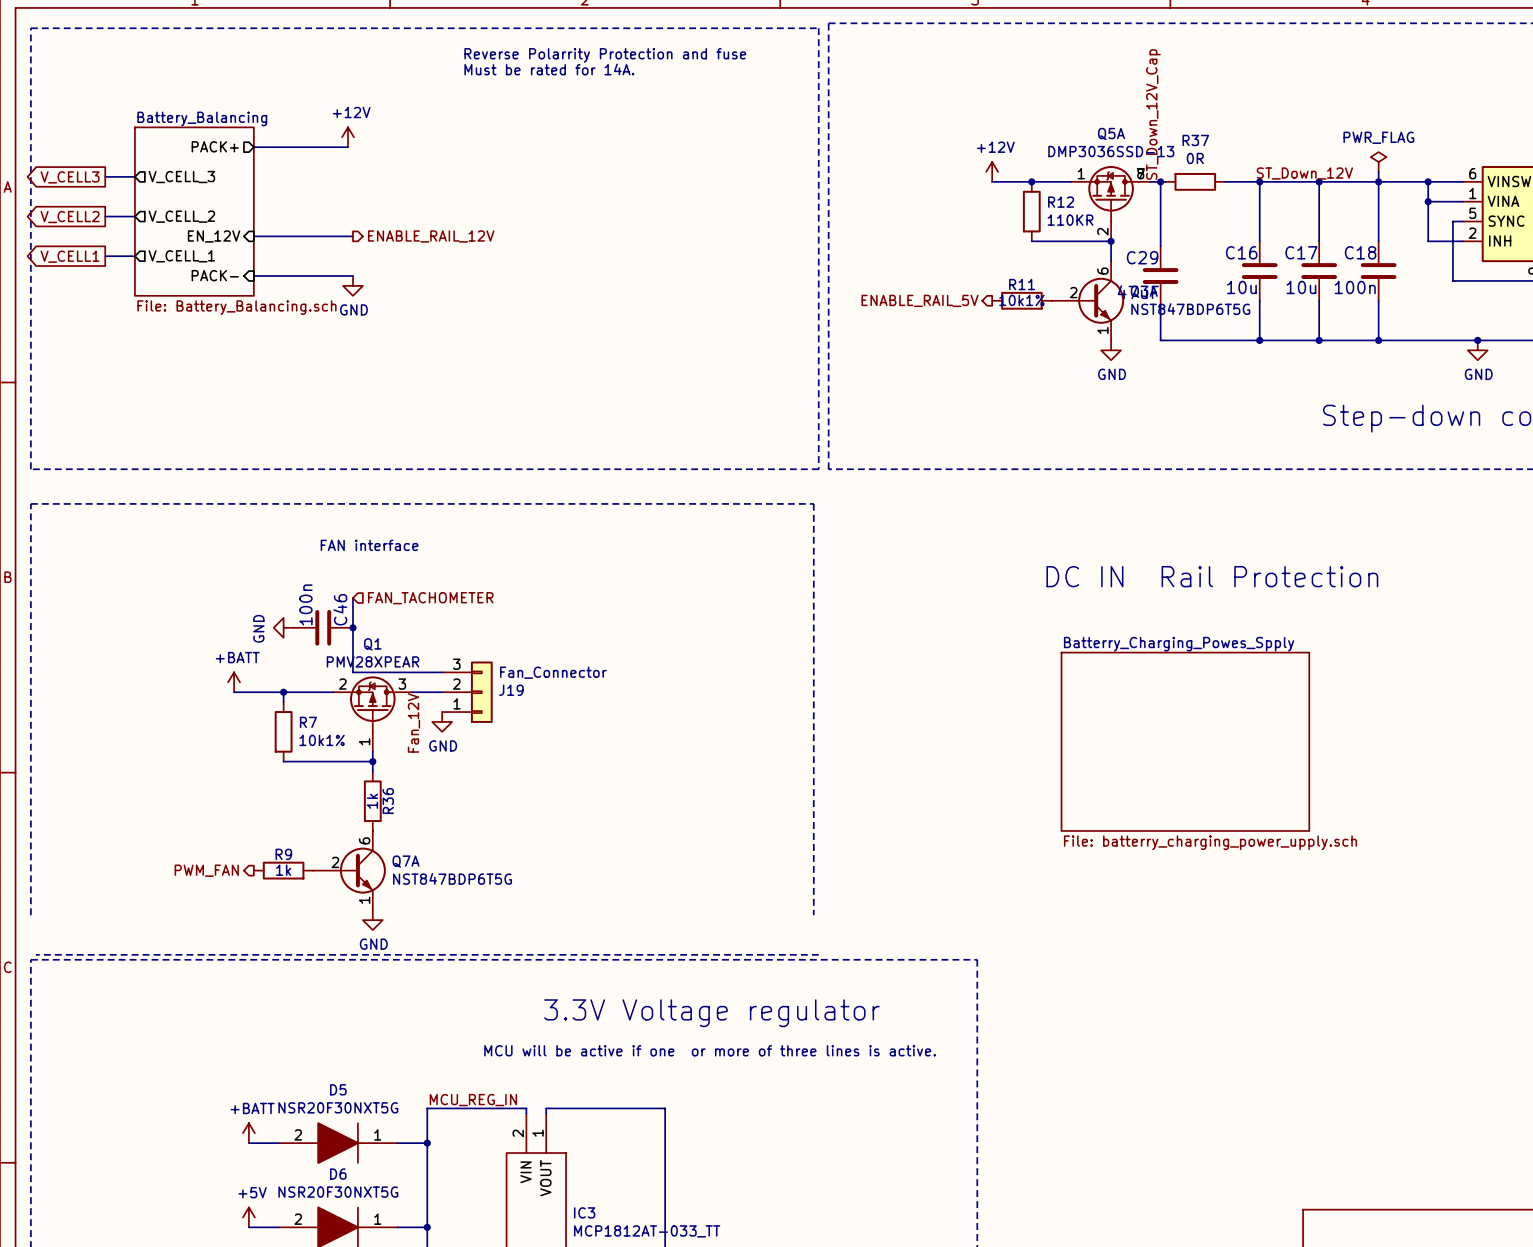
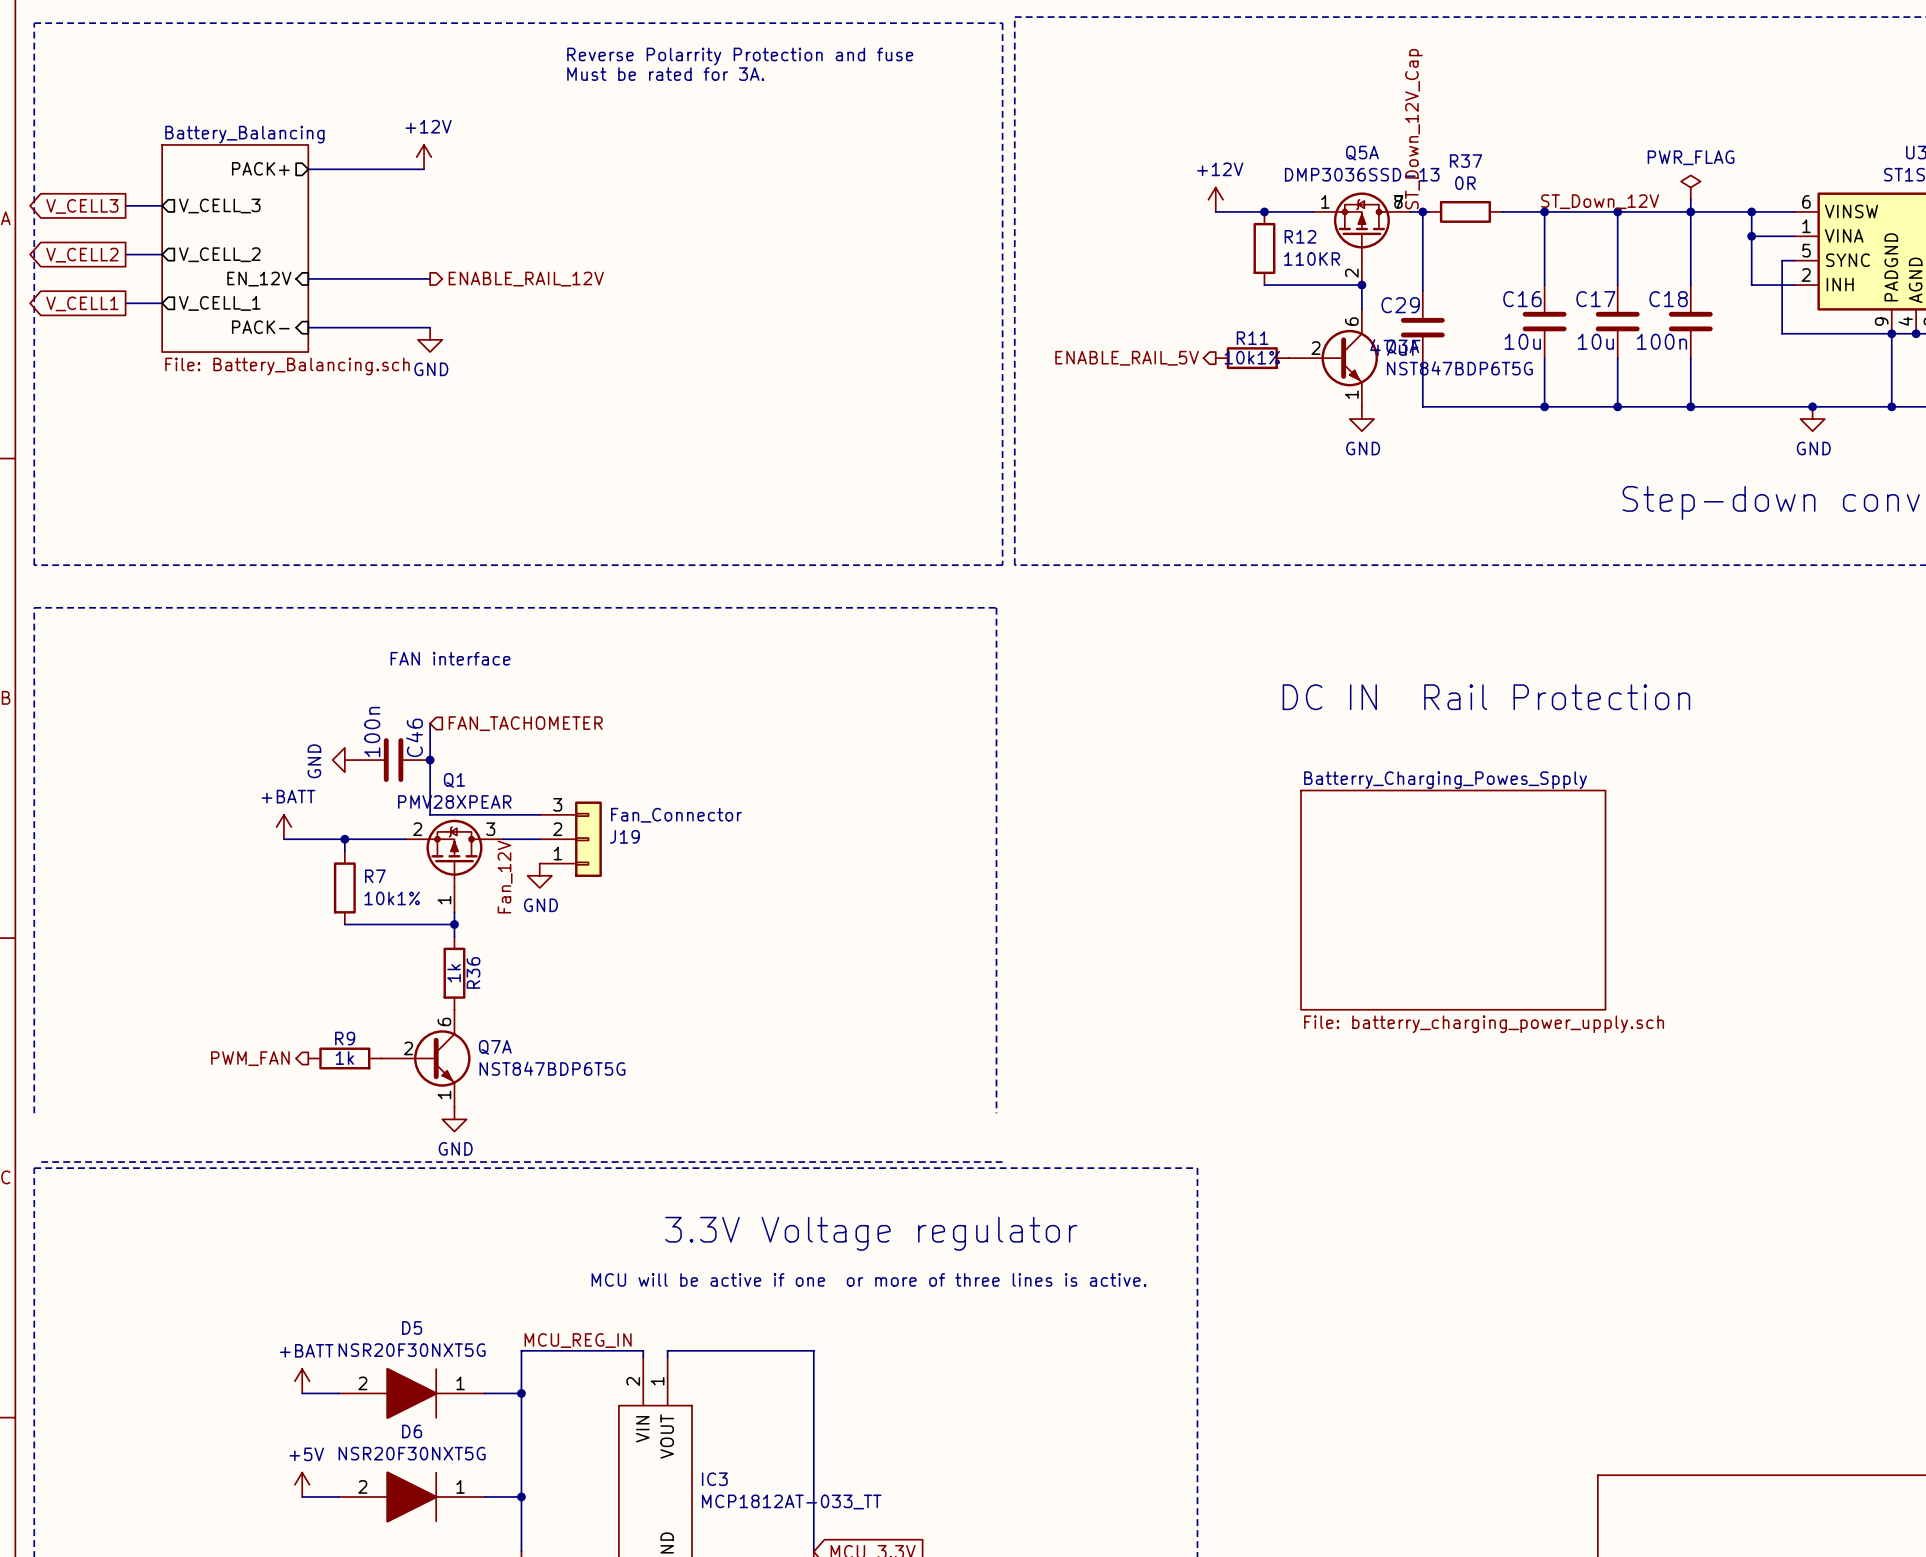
text: Must be rated for 14A. (549, 69) -> Must be rated for 3A. (665, 74)

